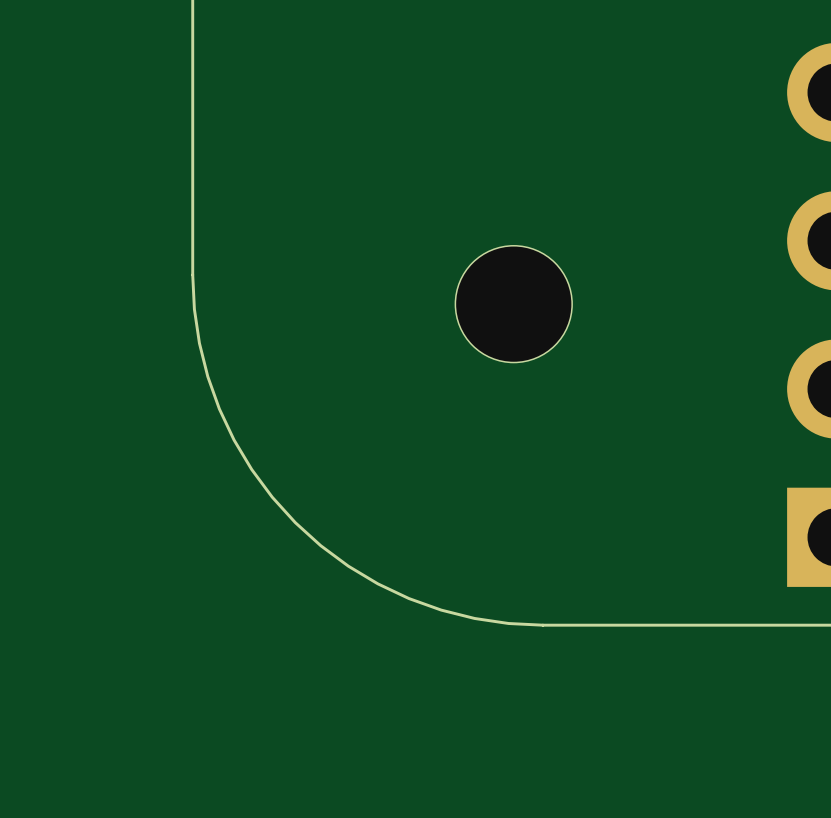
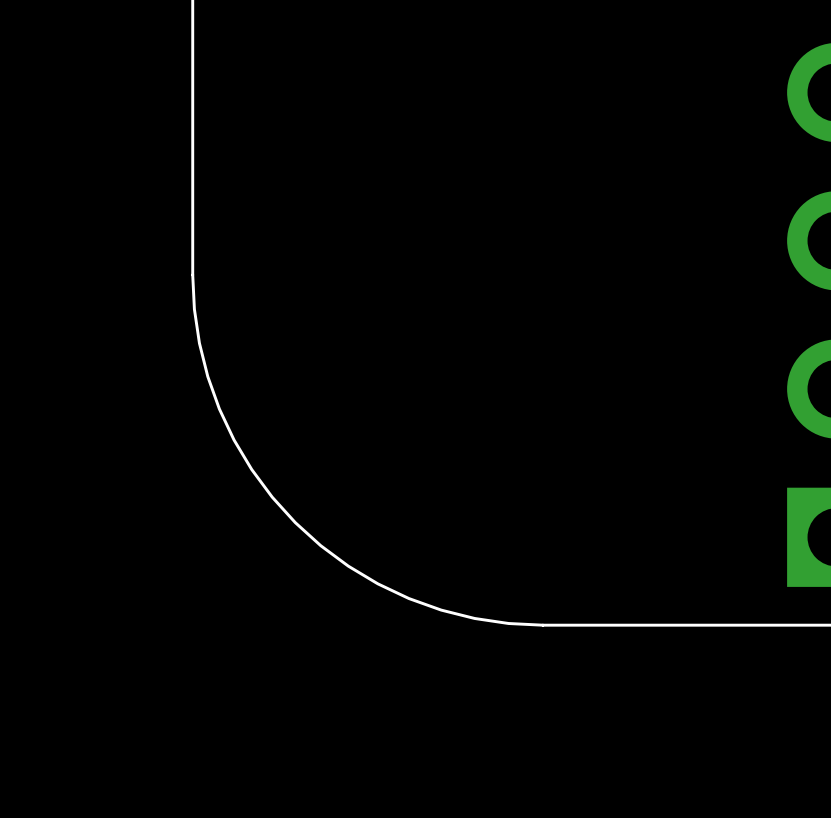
part: (513, 304) -> none

